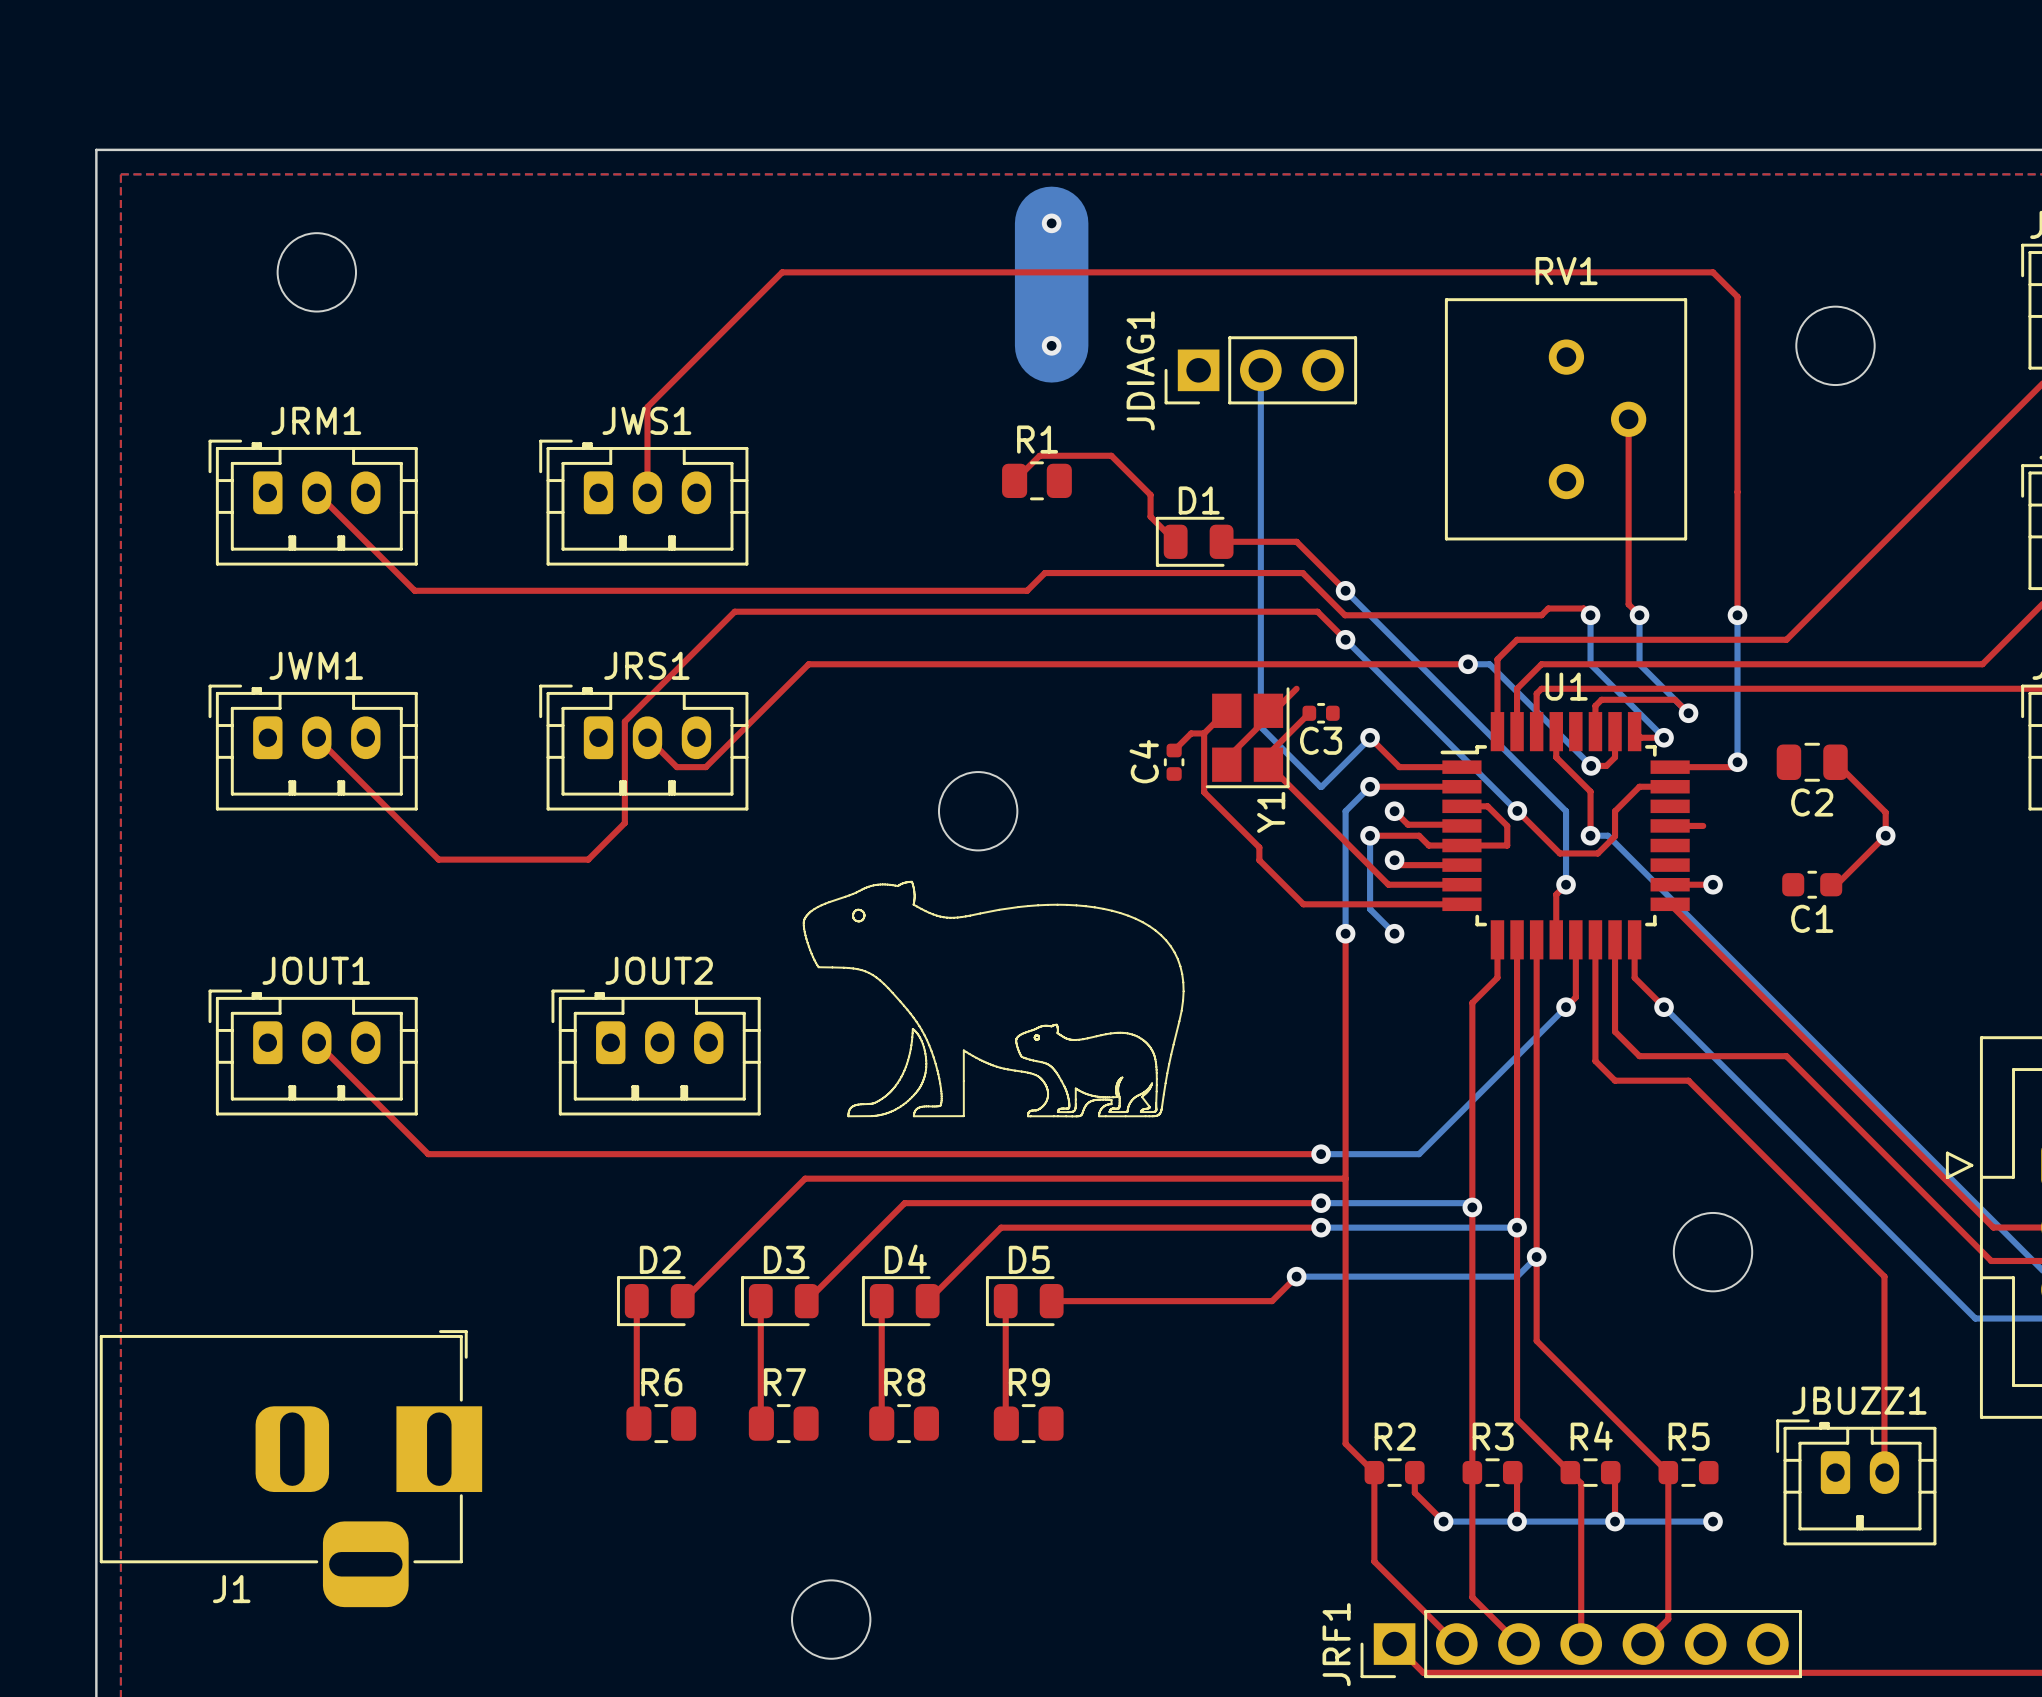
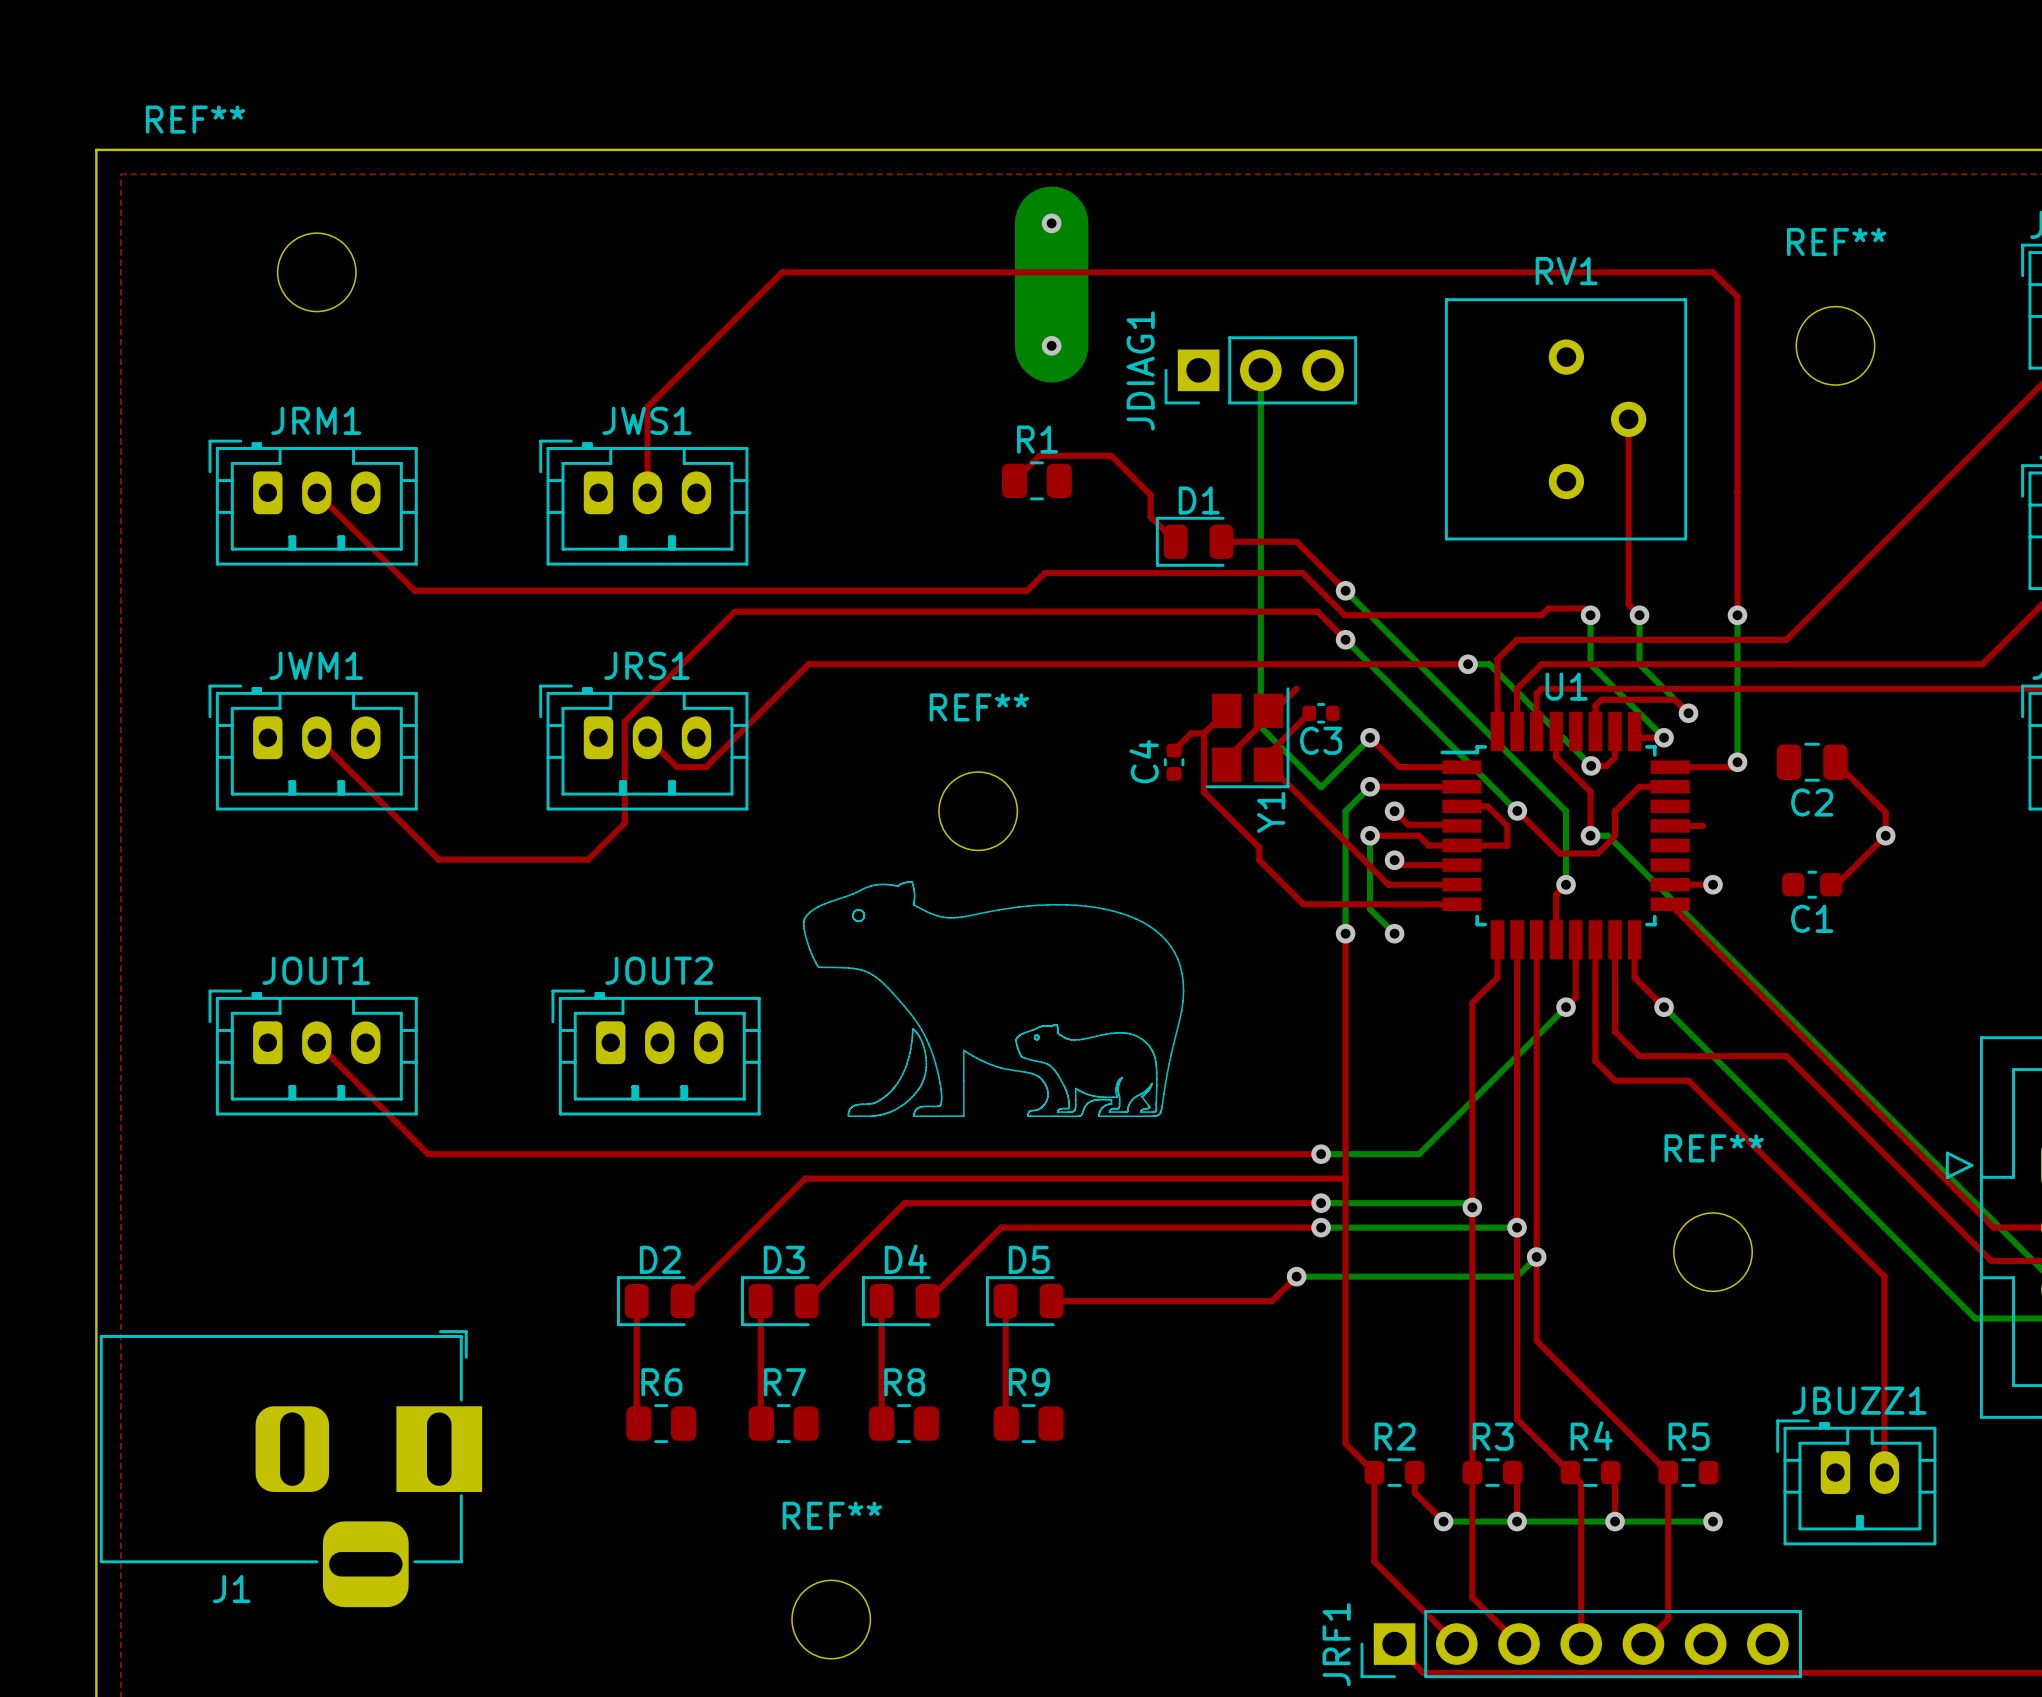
REF** name: none -> REF** (195, 119)
REF** name: none -> REF** (1836, 242)
REF** name: none -> REF** (979, 707)
REF** name: none -> REF** (1714, 1148)
REF** name: none -> REF** (832, 1515)

